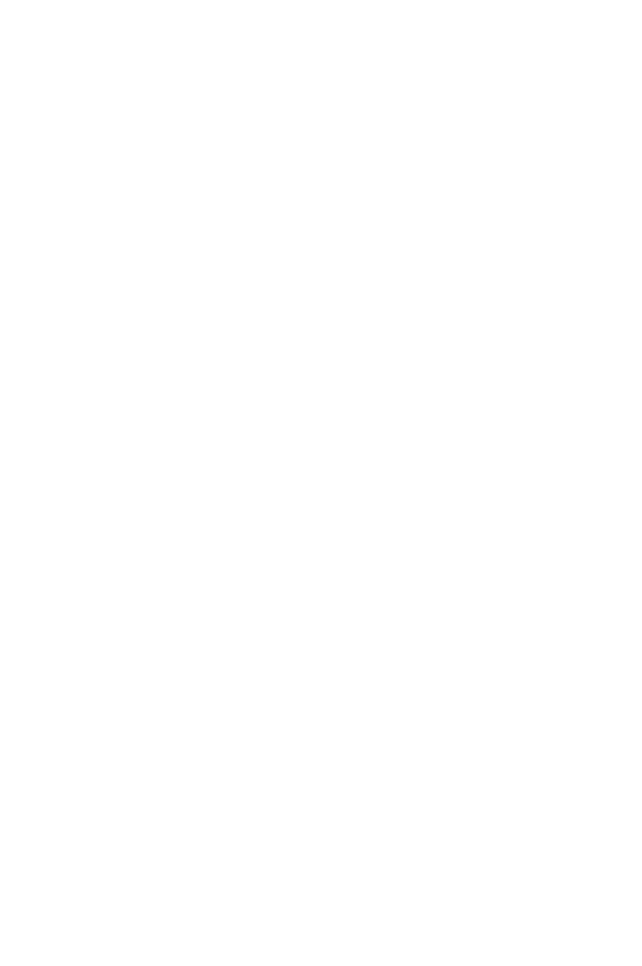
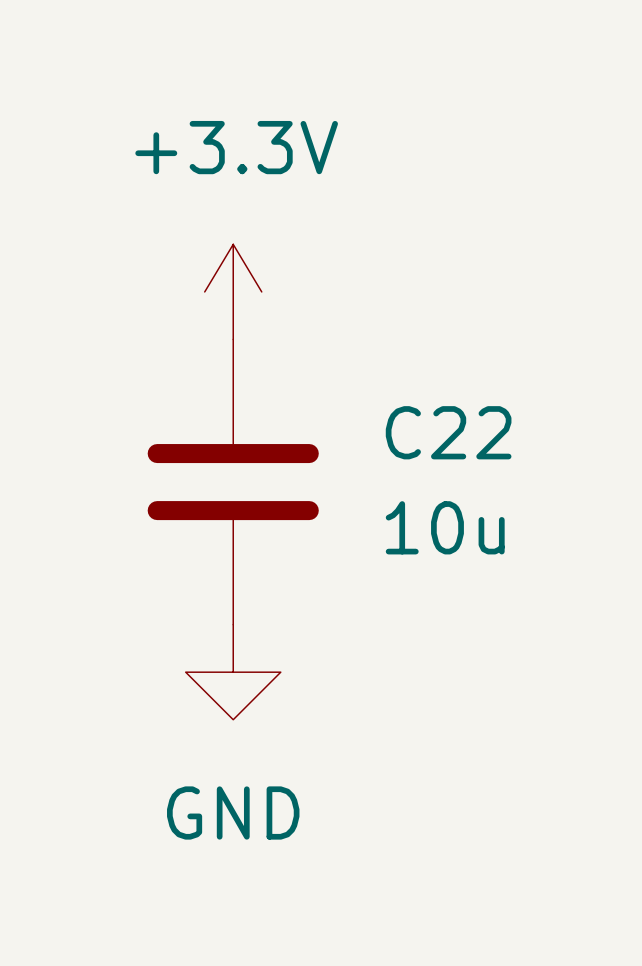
power symbol: none -> +3.3V (233, 291)
C22: none -> 10u (233, 482)
power symbol: none -> GND (233, 672)

